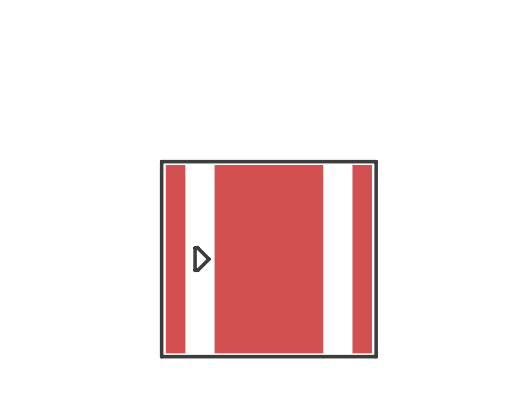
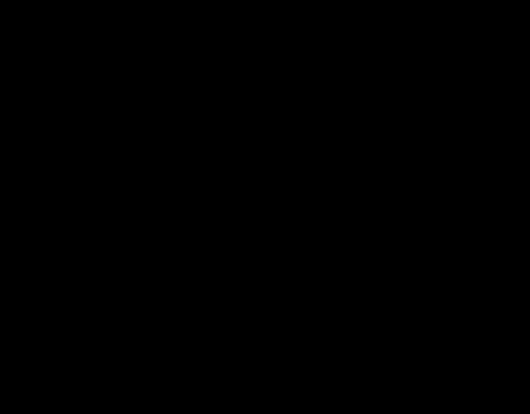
part: (268, 259) -> none

